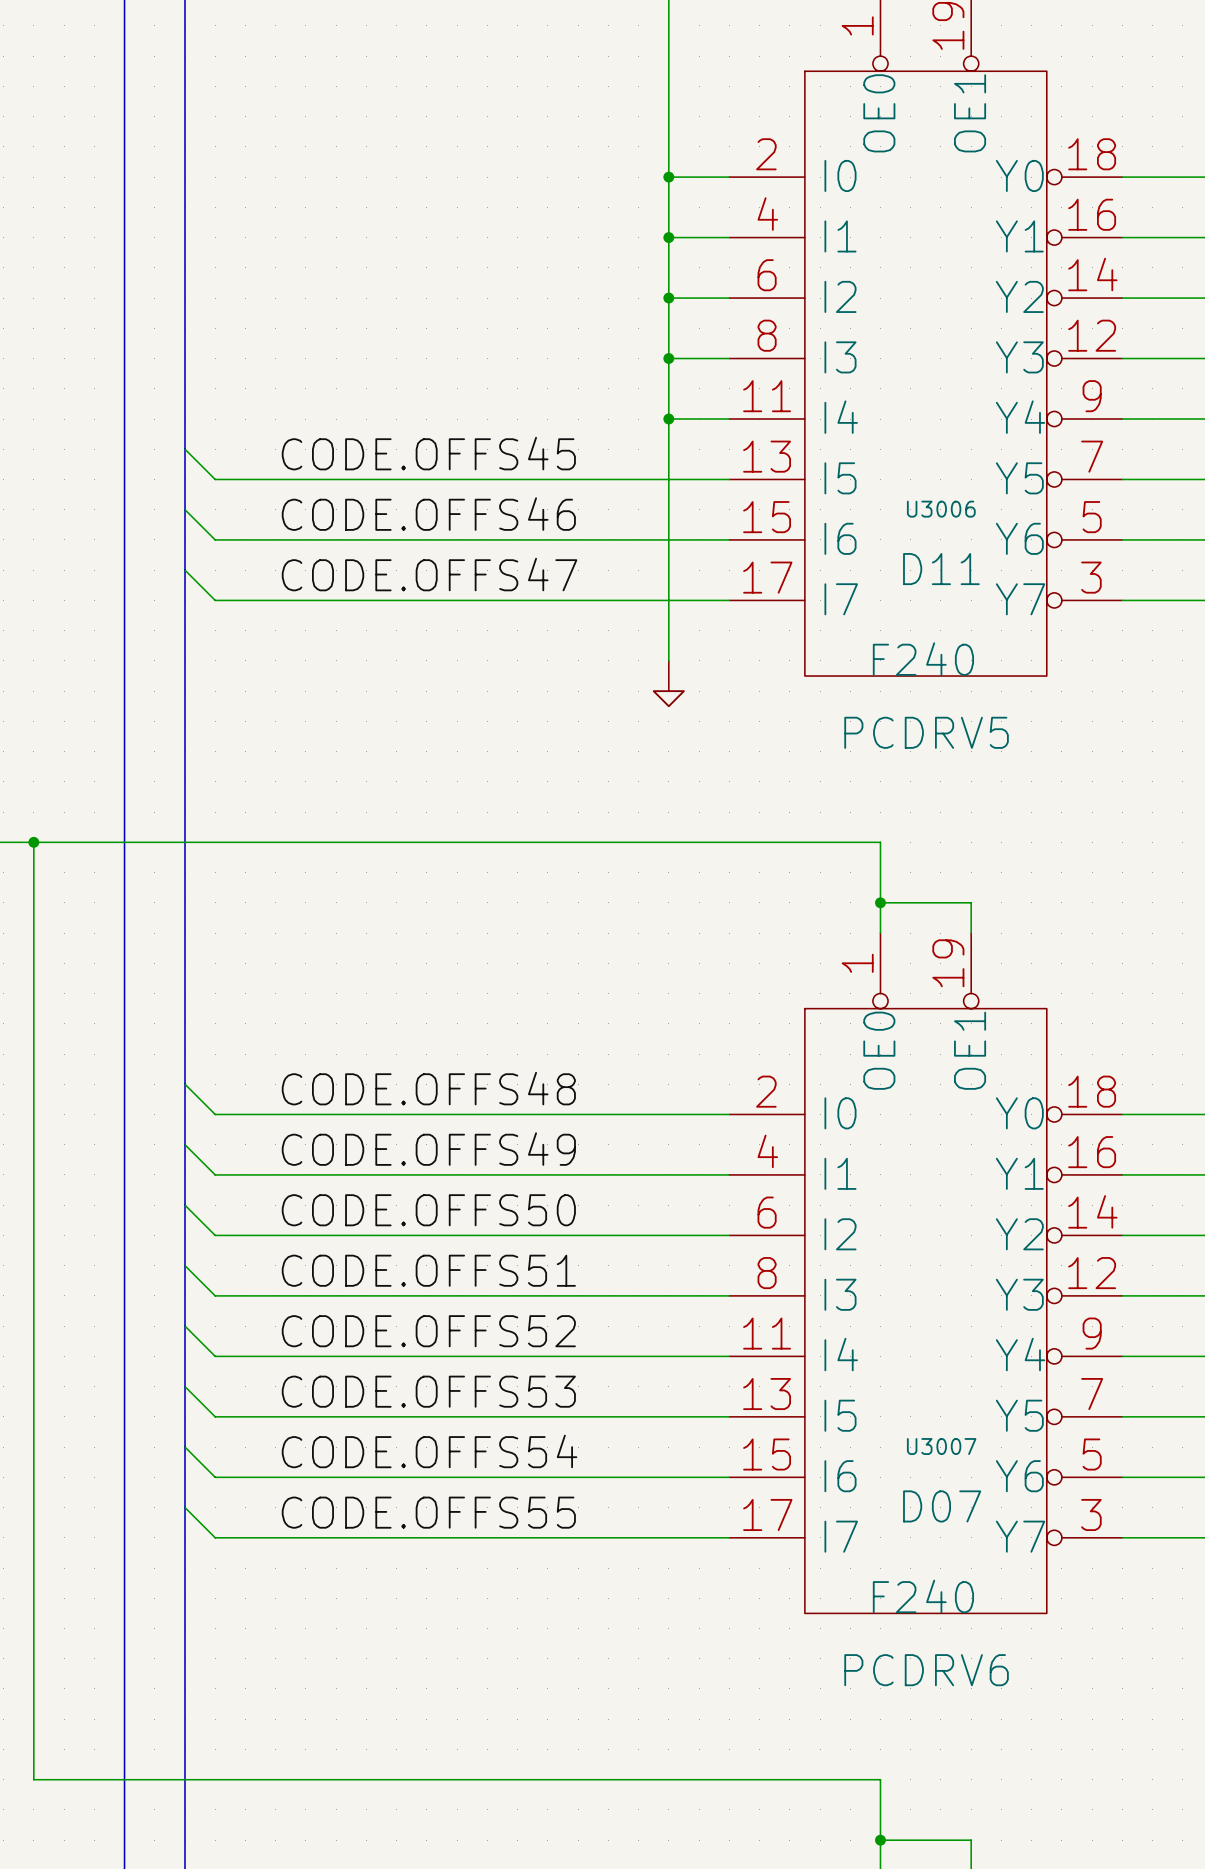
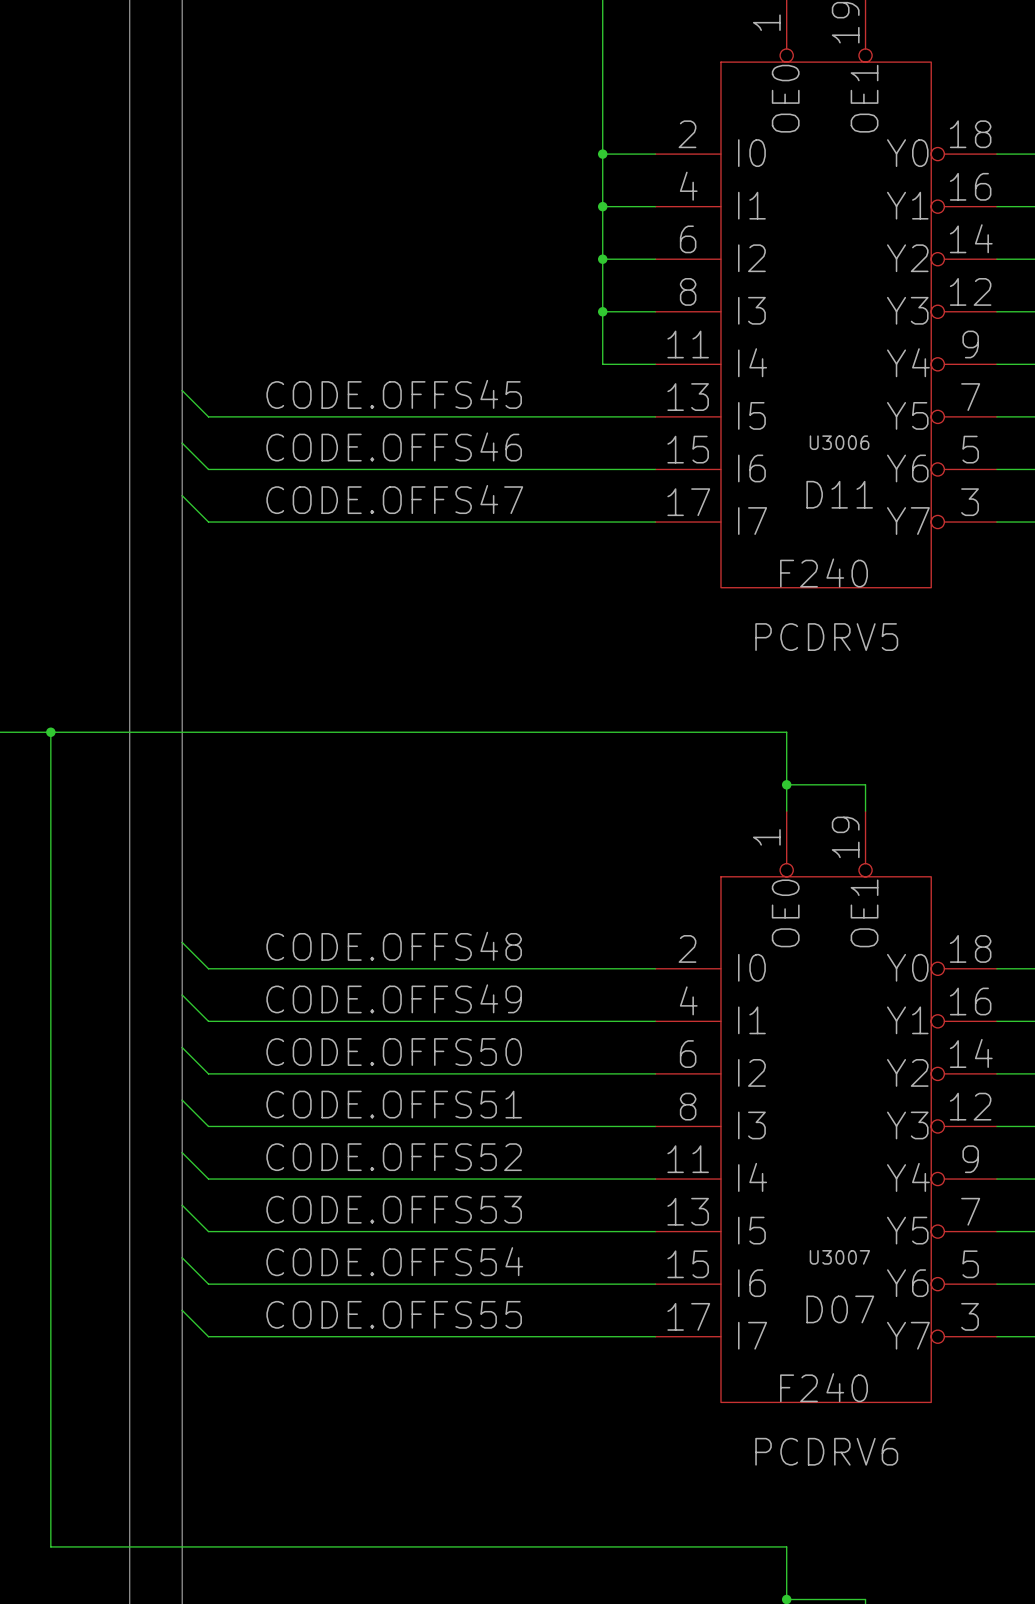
wire: (668, 419) (668, 660) -> none
junction: (668, 419) -> none
power symbol: (668, 684) -> none

